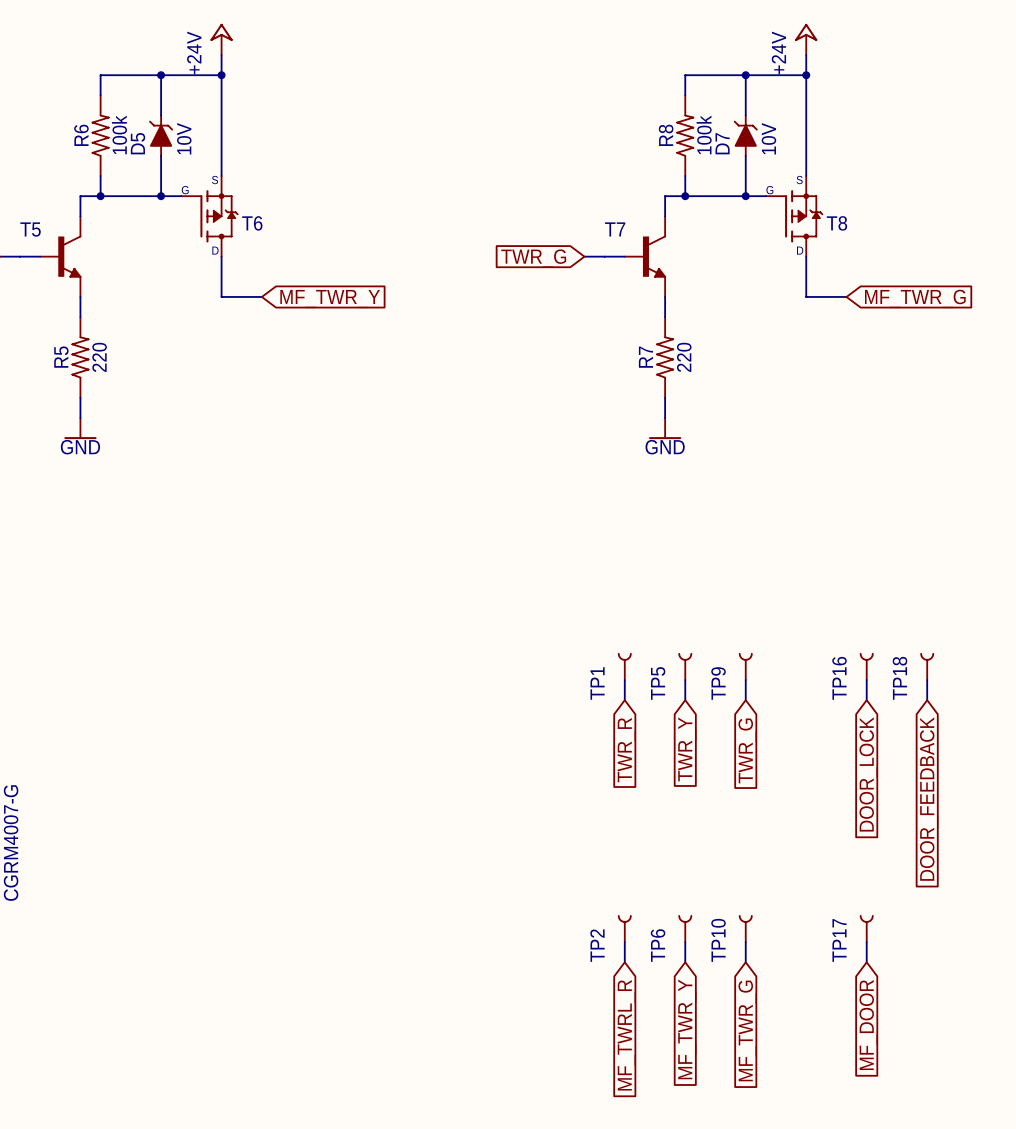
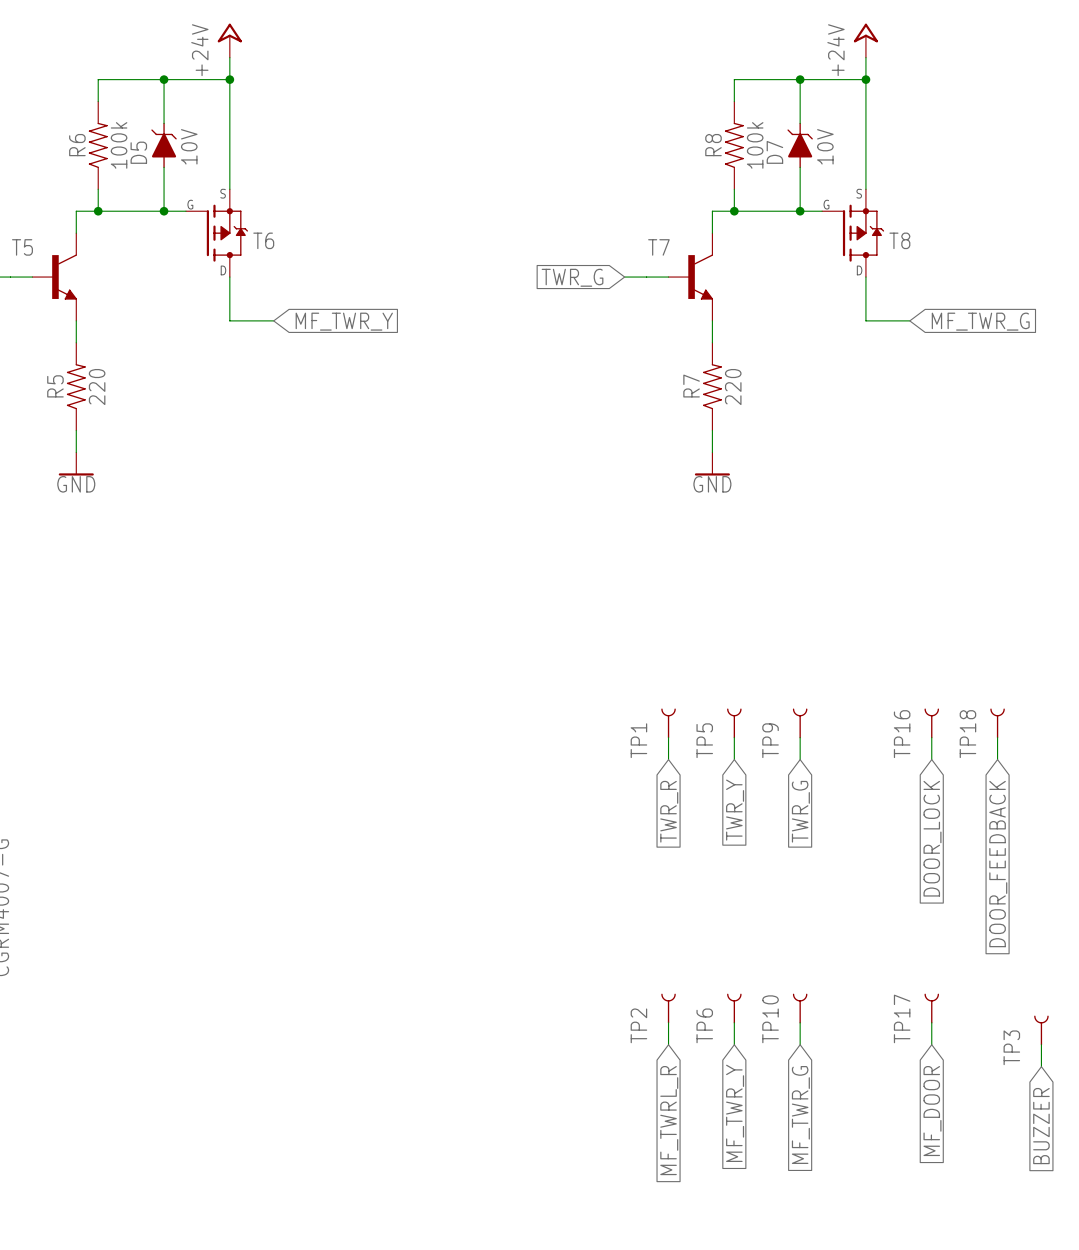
TP3: none -> (1041, 1030)
wire: none -> (1041, 1044) (1041, 1066)
global label: none -> BUZZER (1041, 1126)

